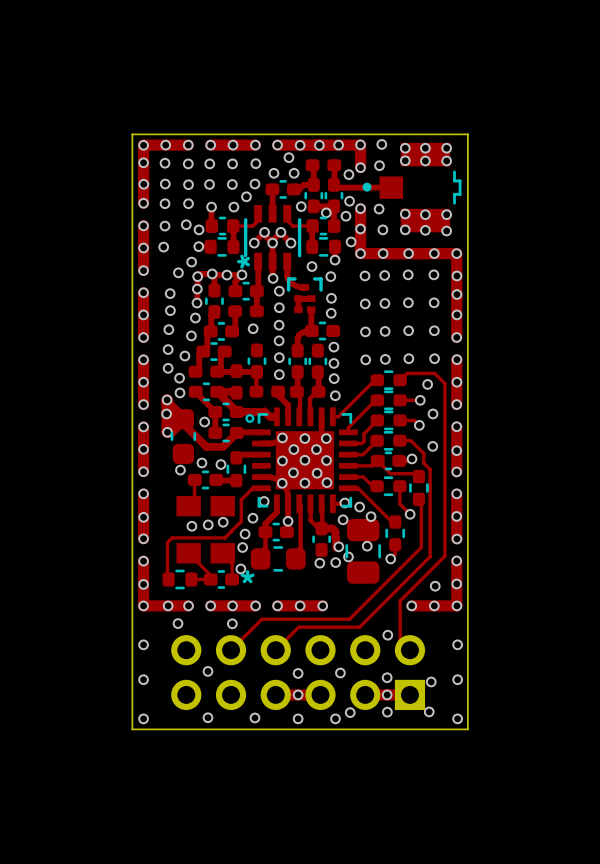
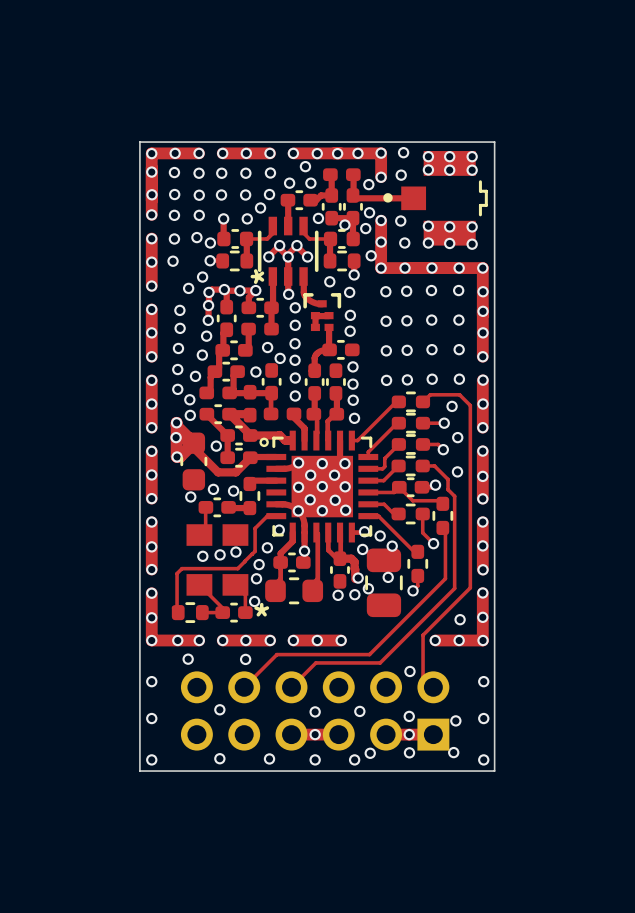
via: none -> (280, 358)
via: none -> (255, 371)

